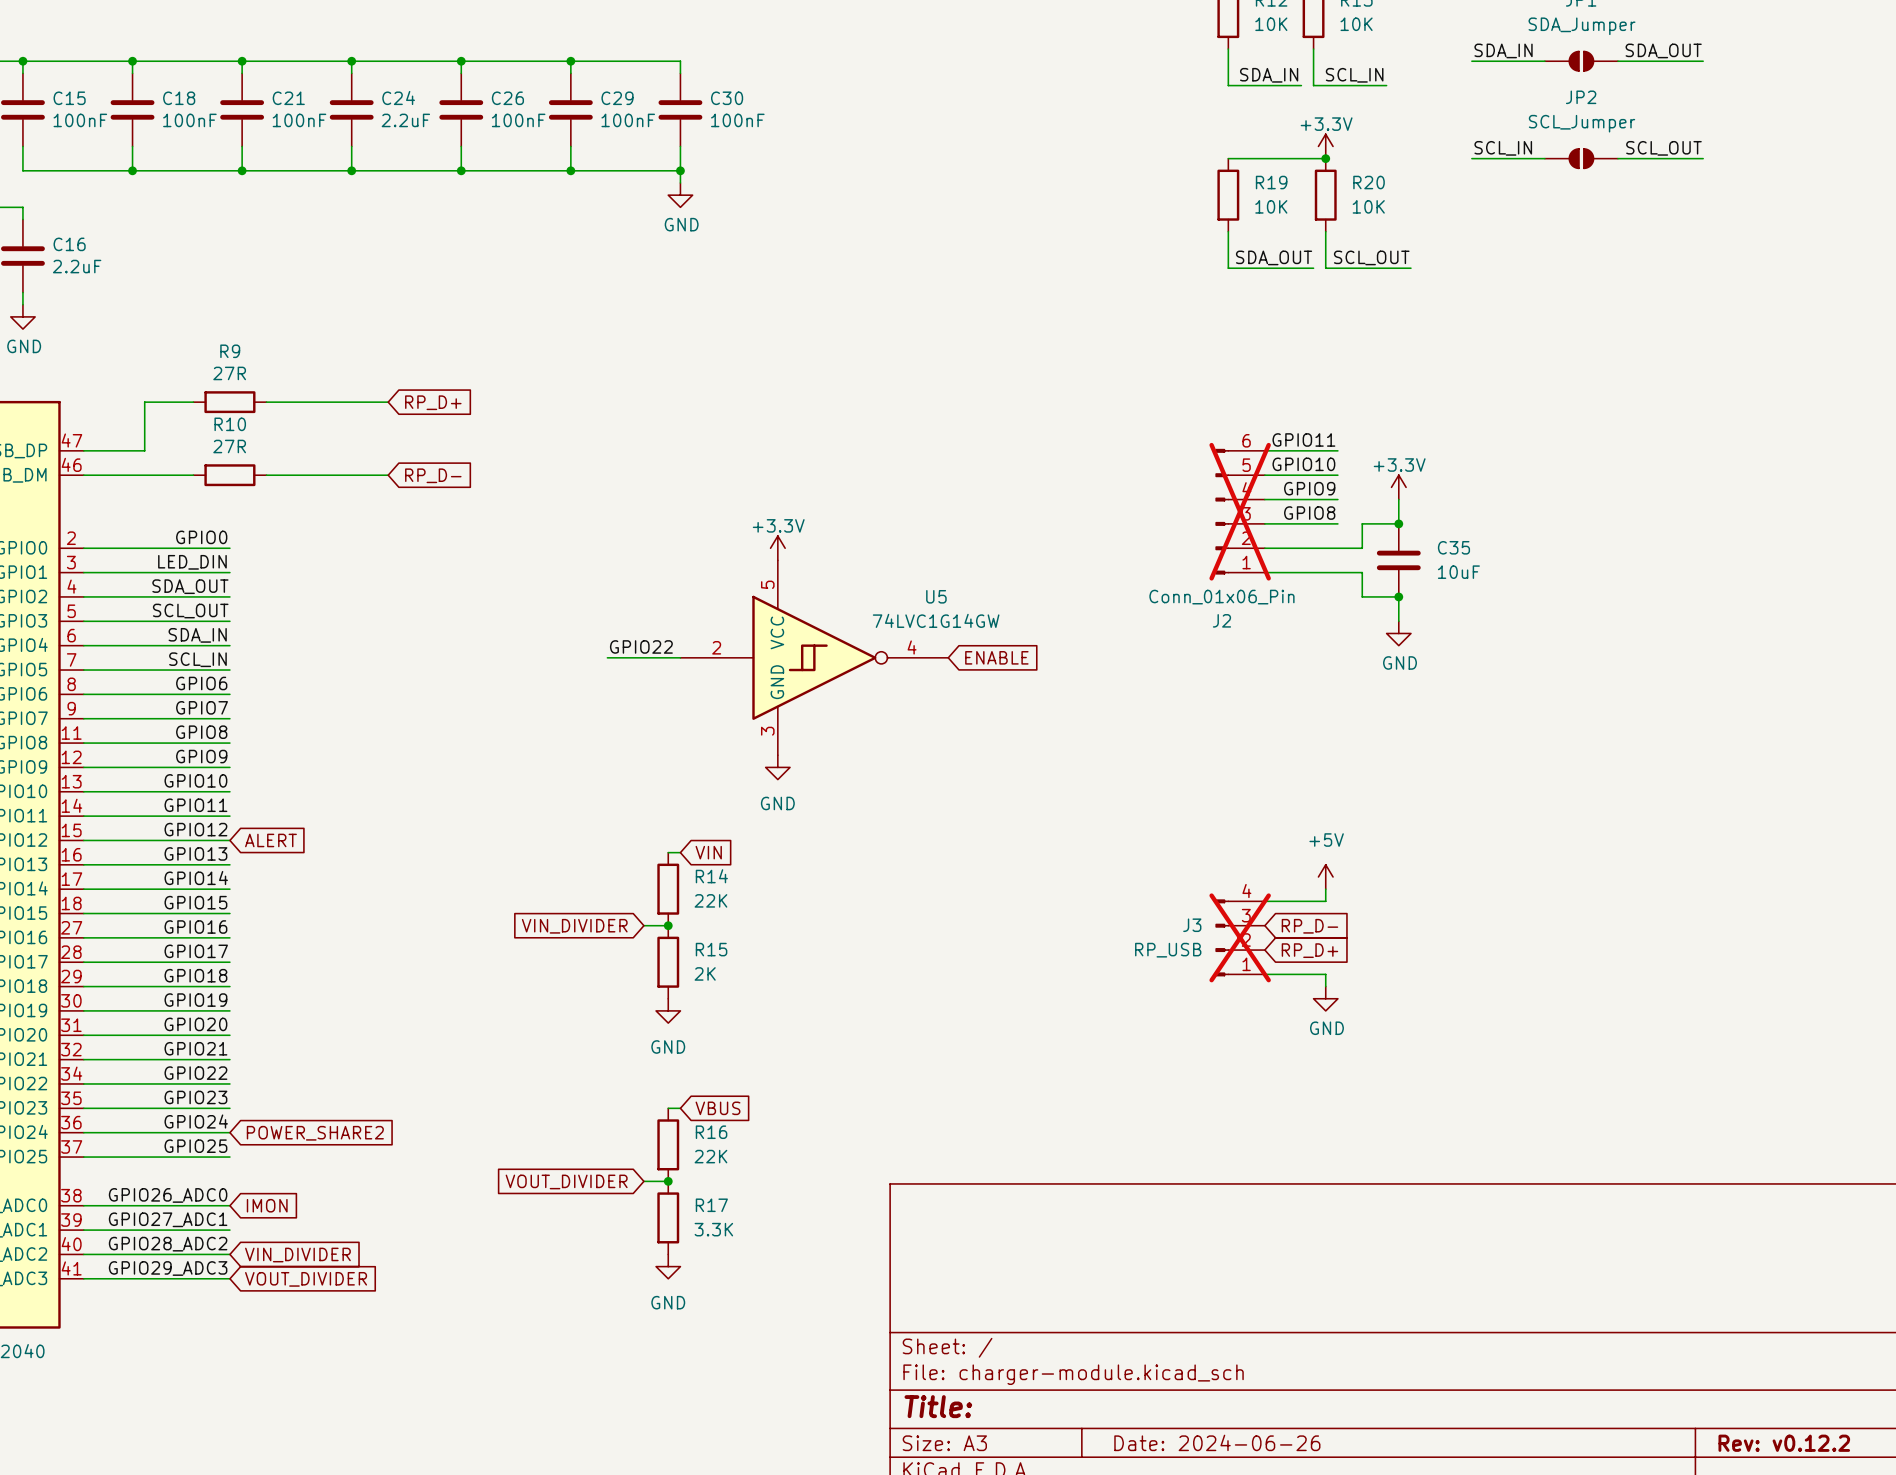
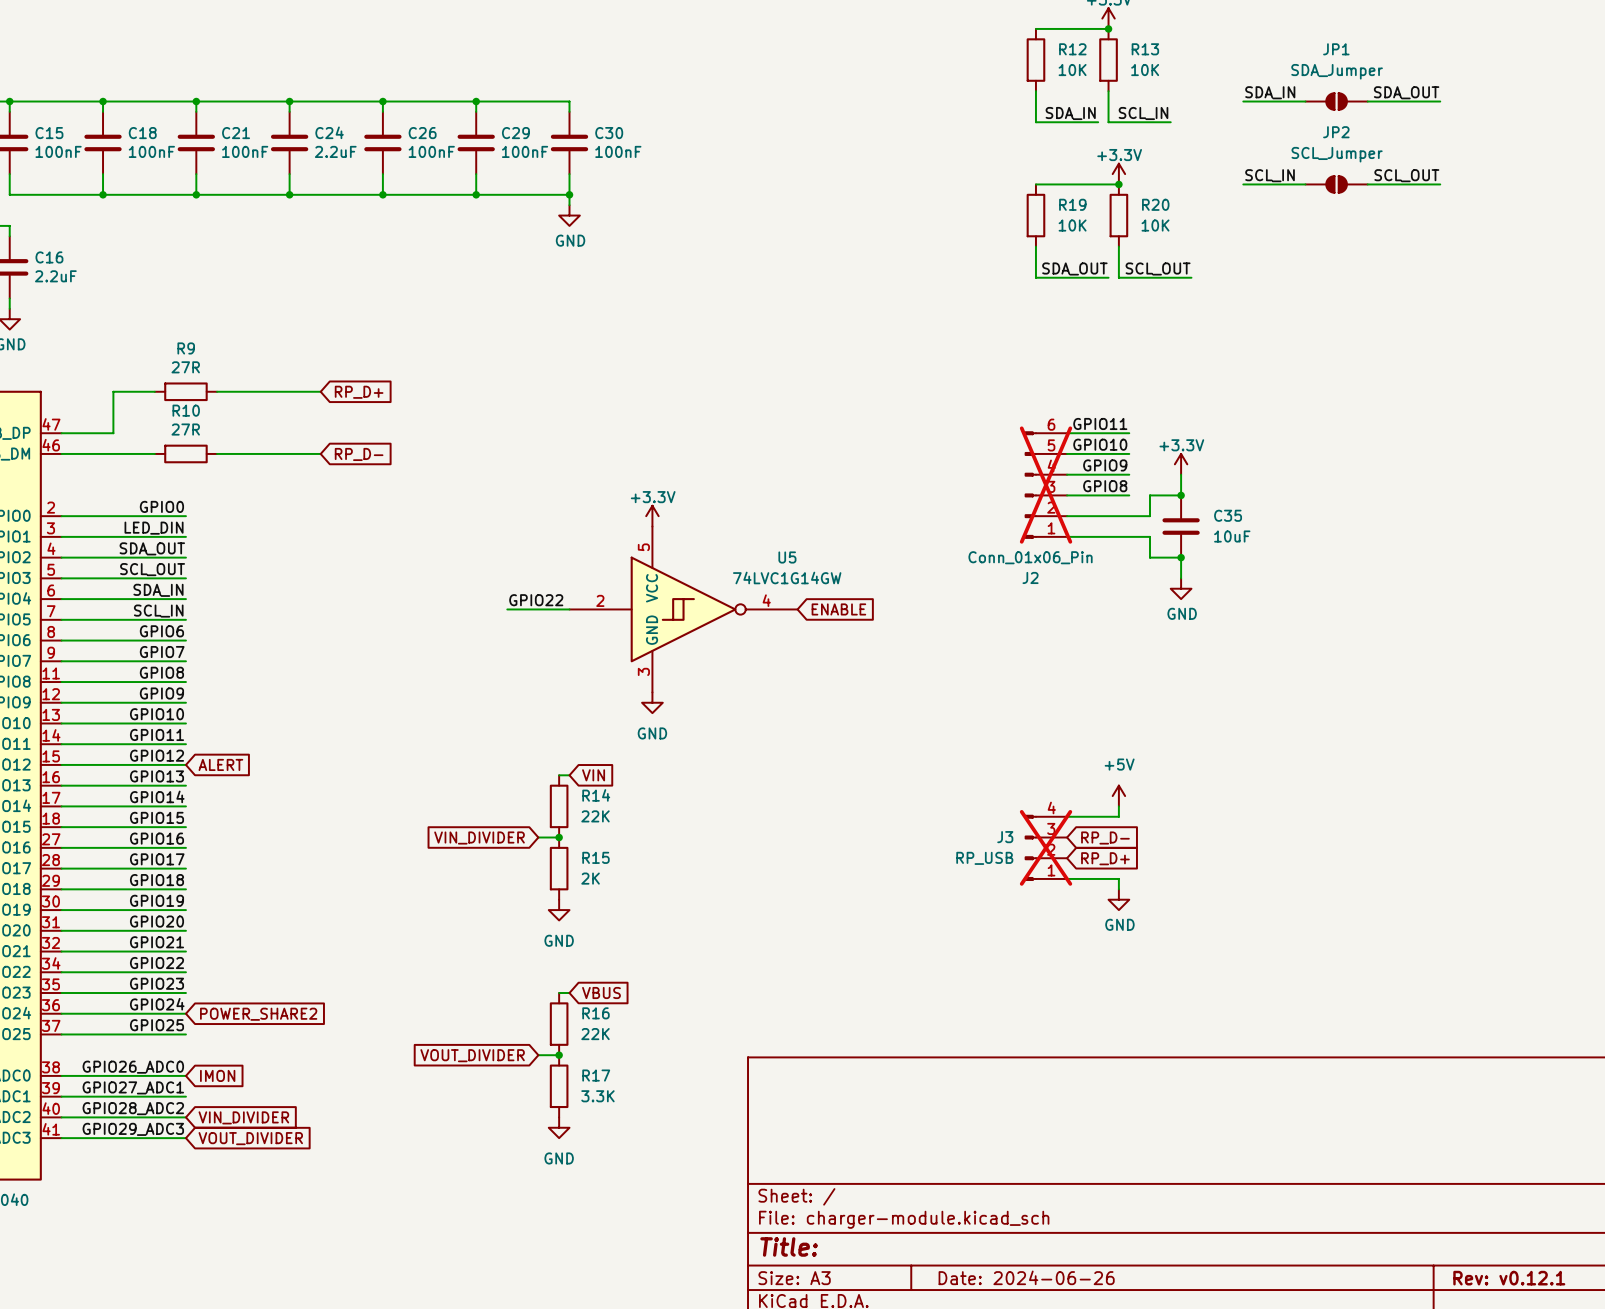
title block: Rev: v0.12.2 (1784, 1443) -> Rev: v0.12.1 (1509, 1278)

